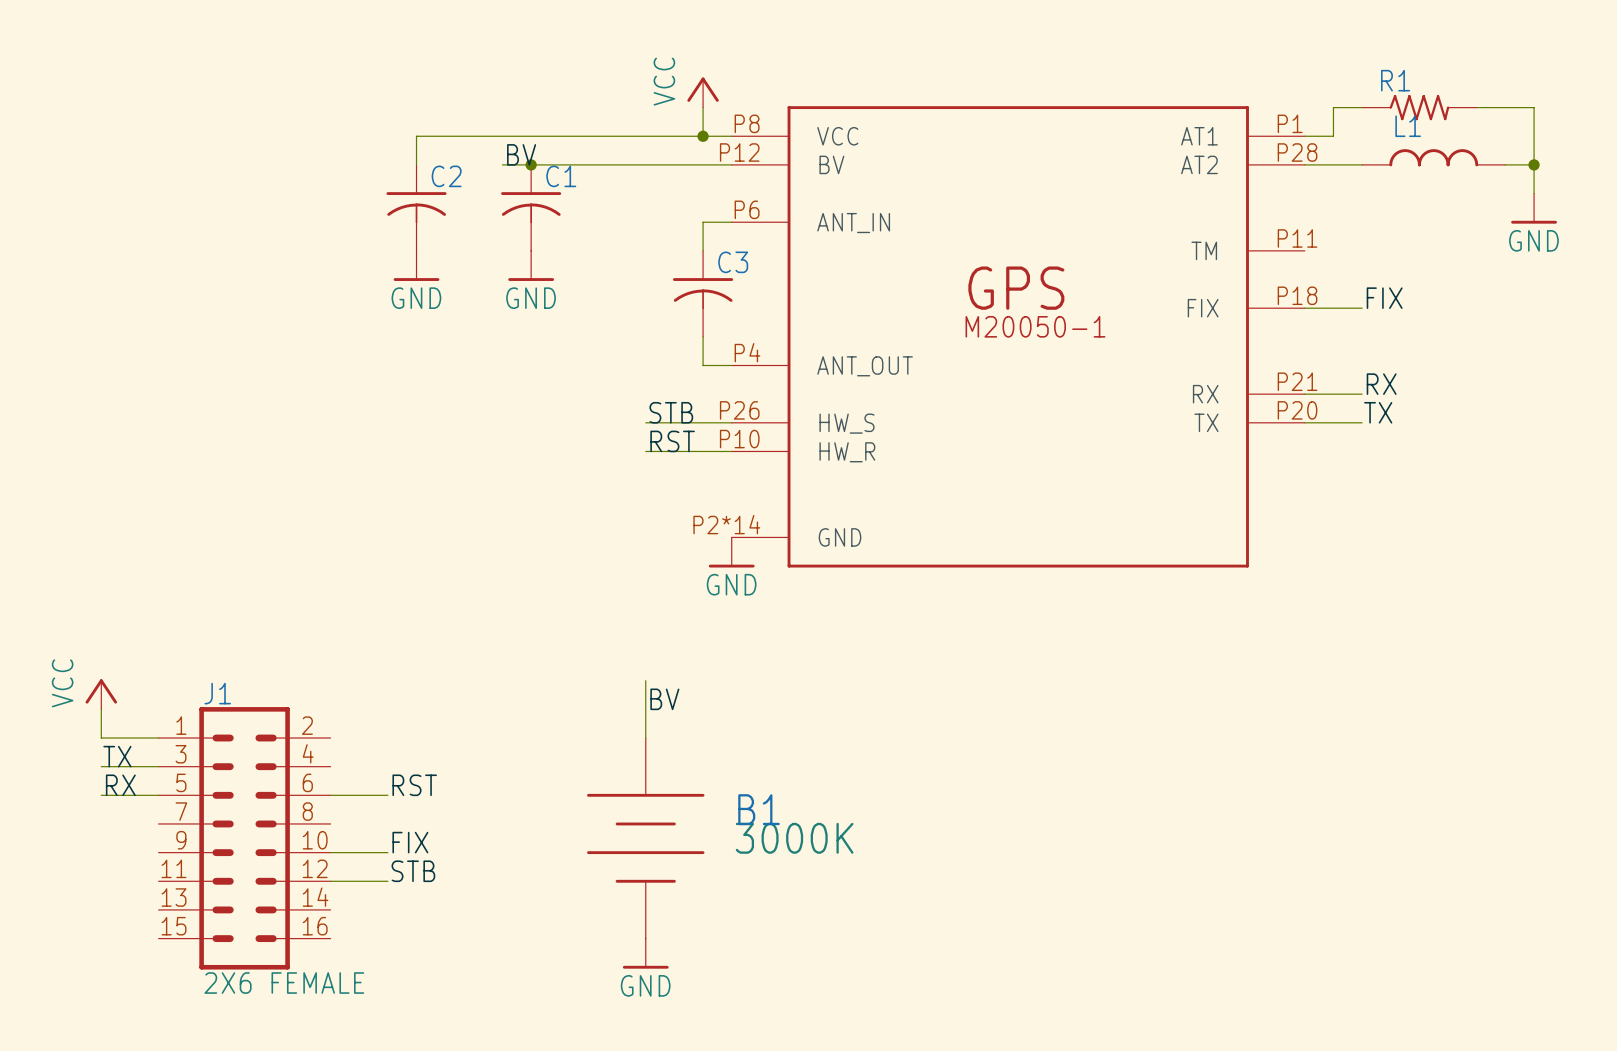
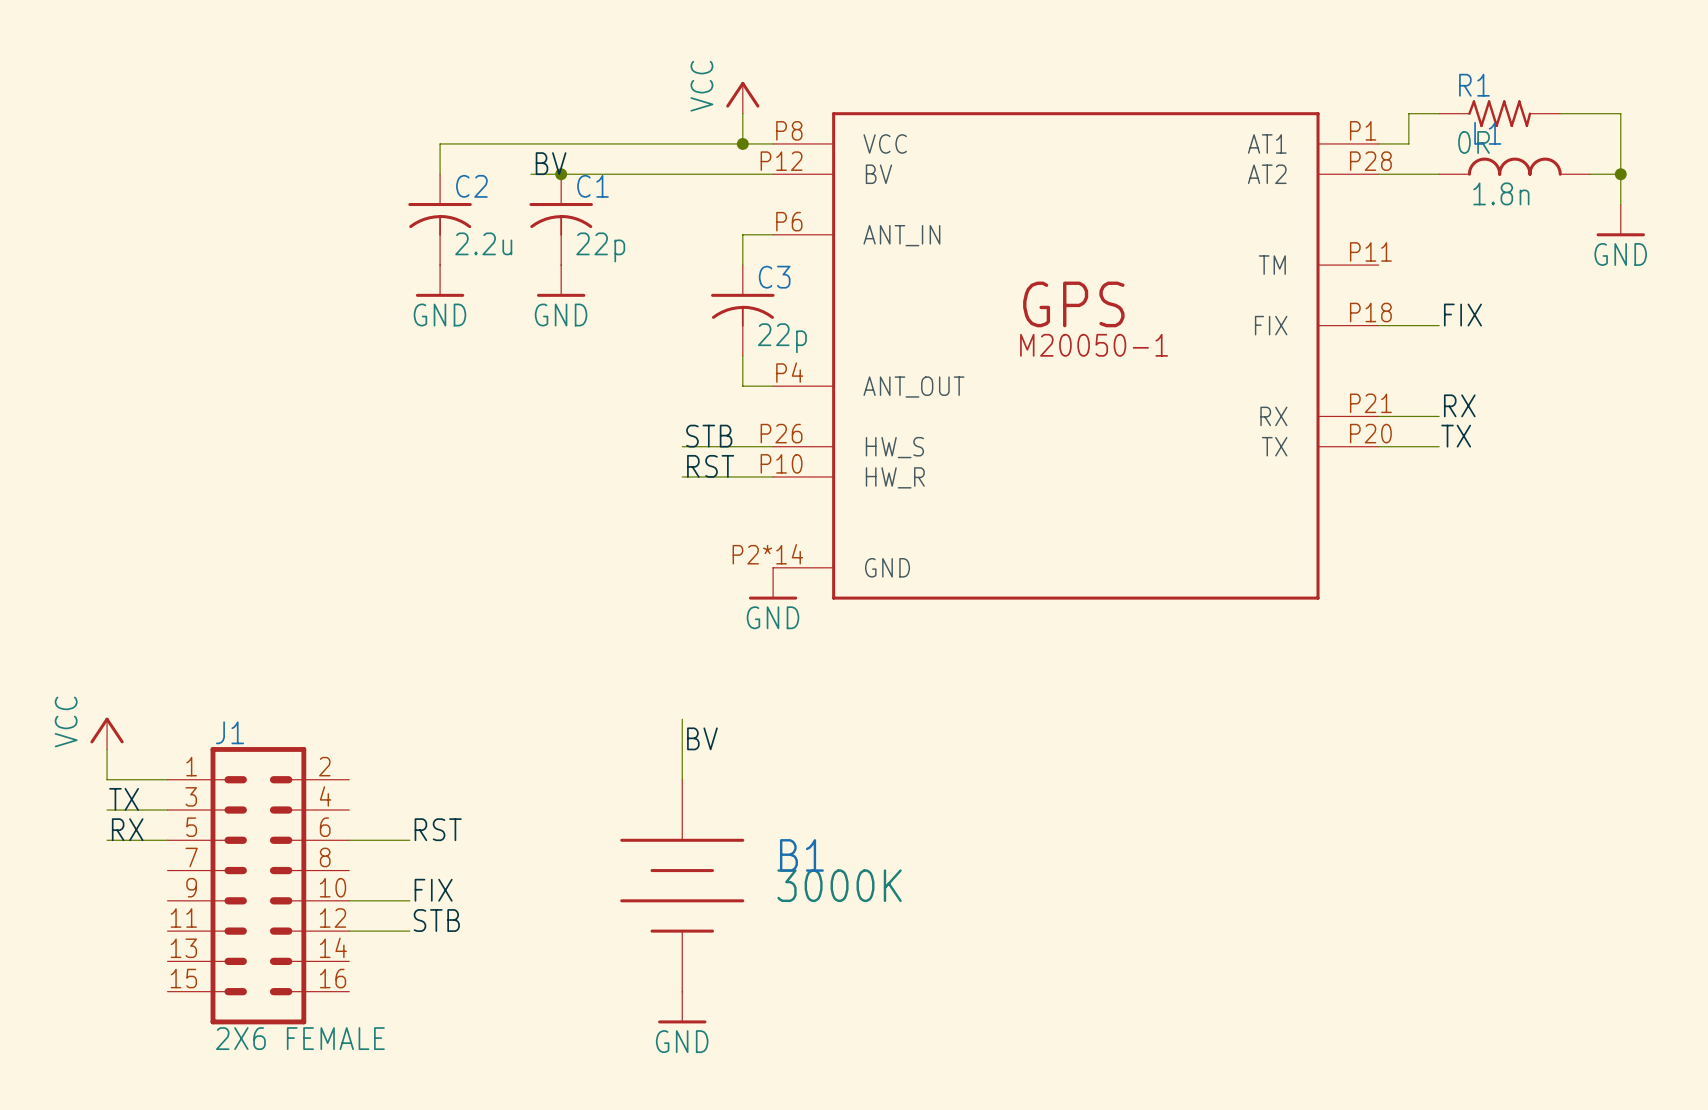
R1 value: none -> 0R (1474, 142)
L1 value: none -> 1.8n (1501, 193)
C2 value: none -> 2.2u (483, 243)
C1 value: none -> 22p (600, 247)
C3 value: none -> 22p (782, 338)

